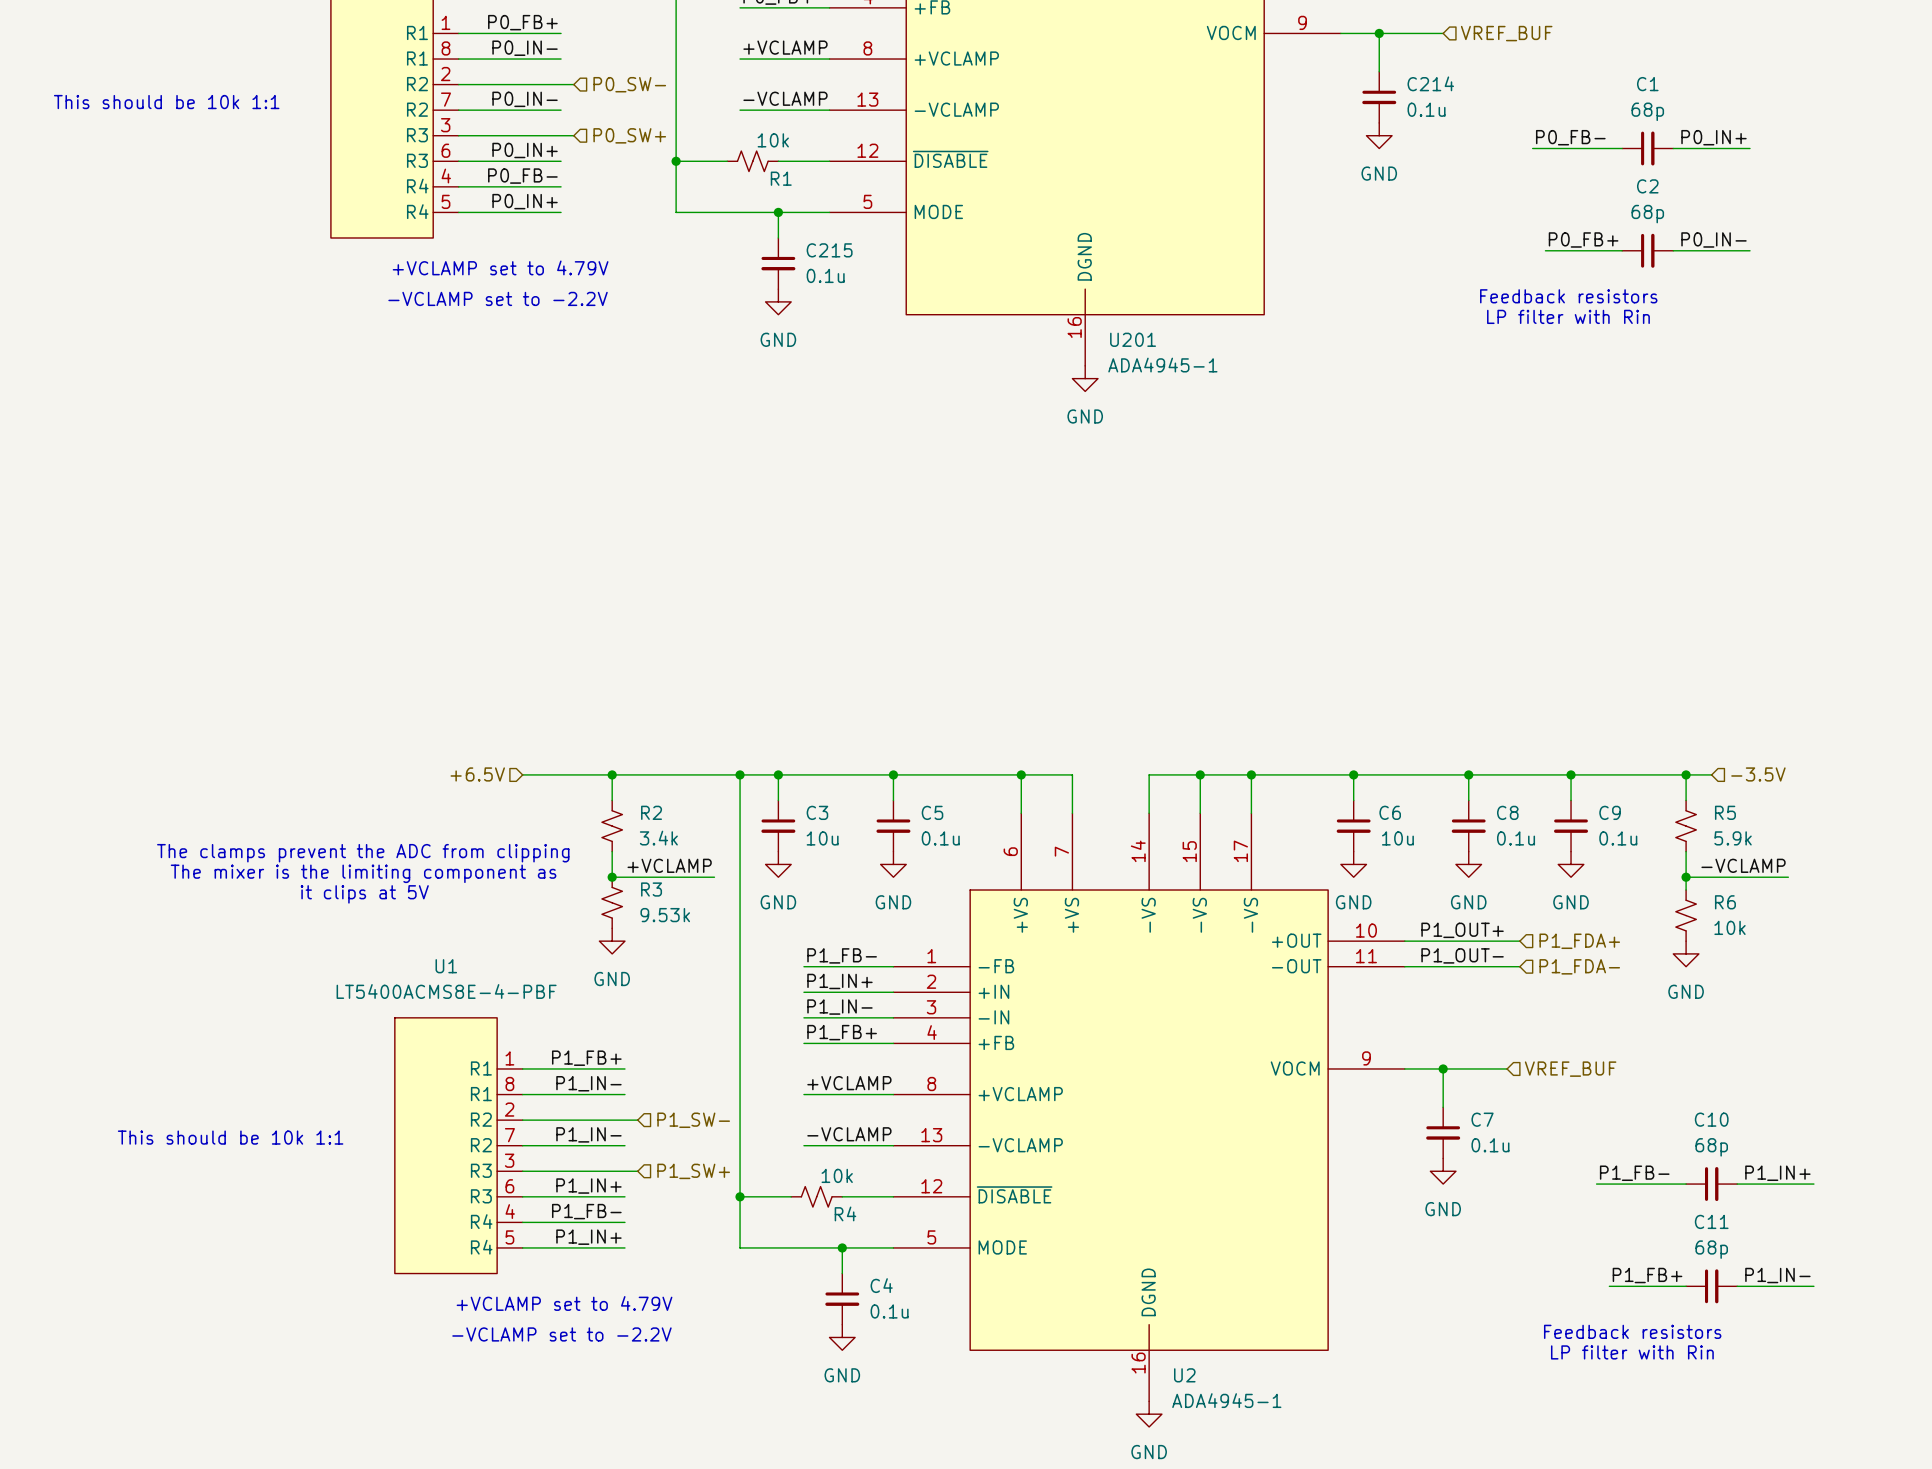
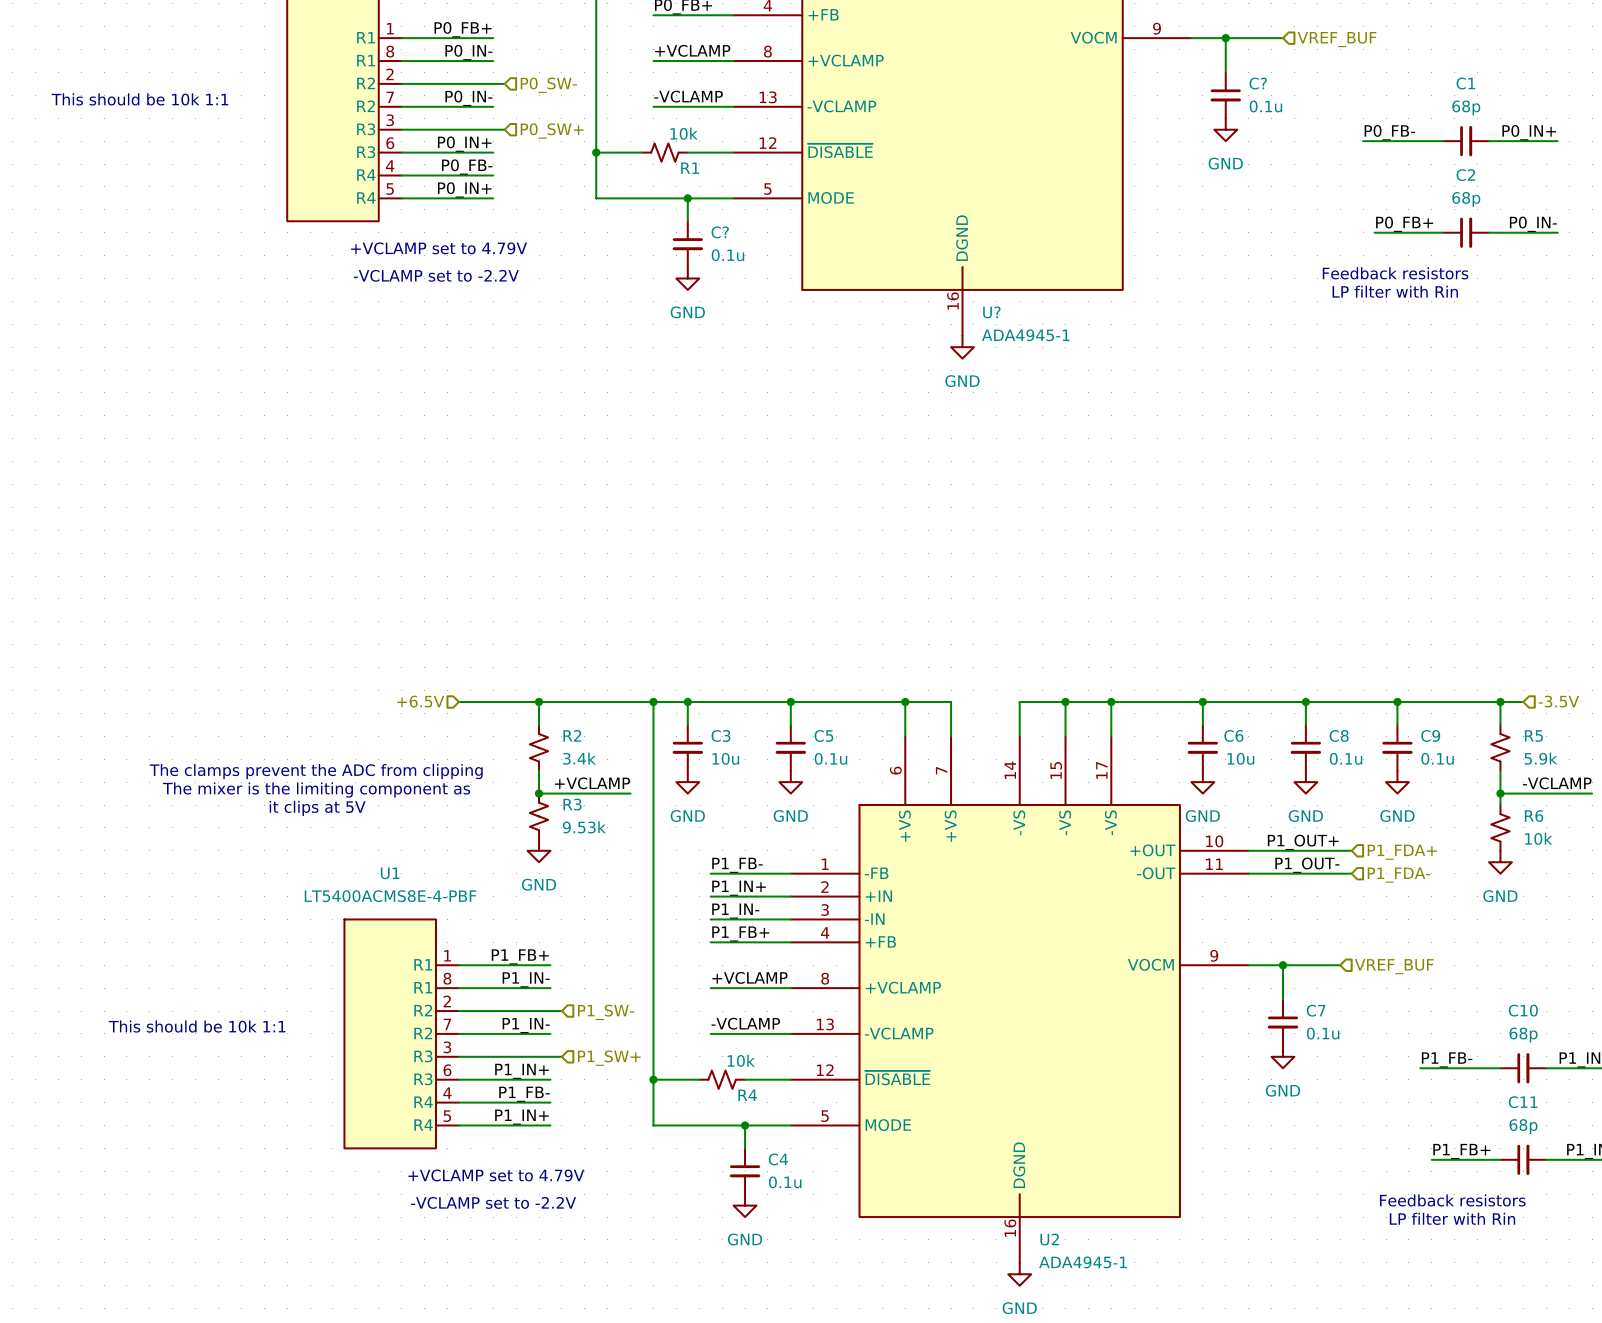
C214 name: C214 (1430, 83) -> C? (1258, 83)
C215 name: C215 (829, 250) -> C? (720, 232)
U201 name: U201 (1133, 339) -> U? (991, 312)

